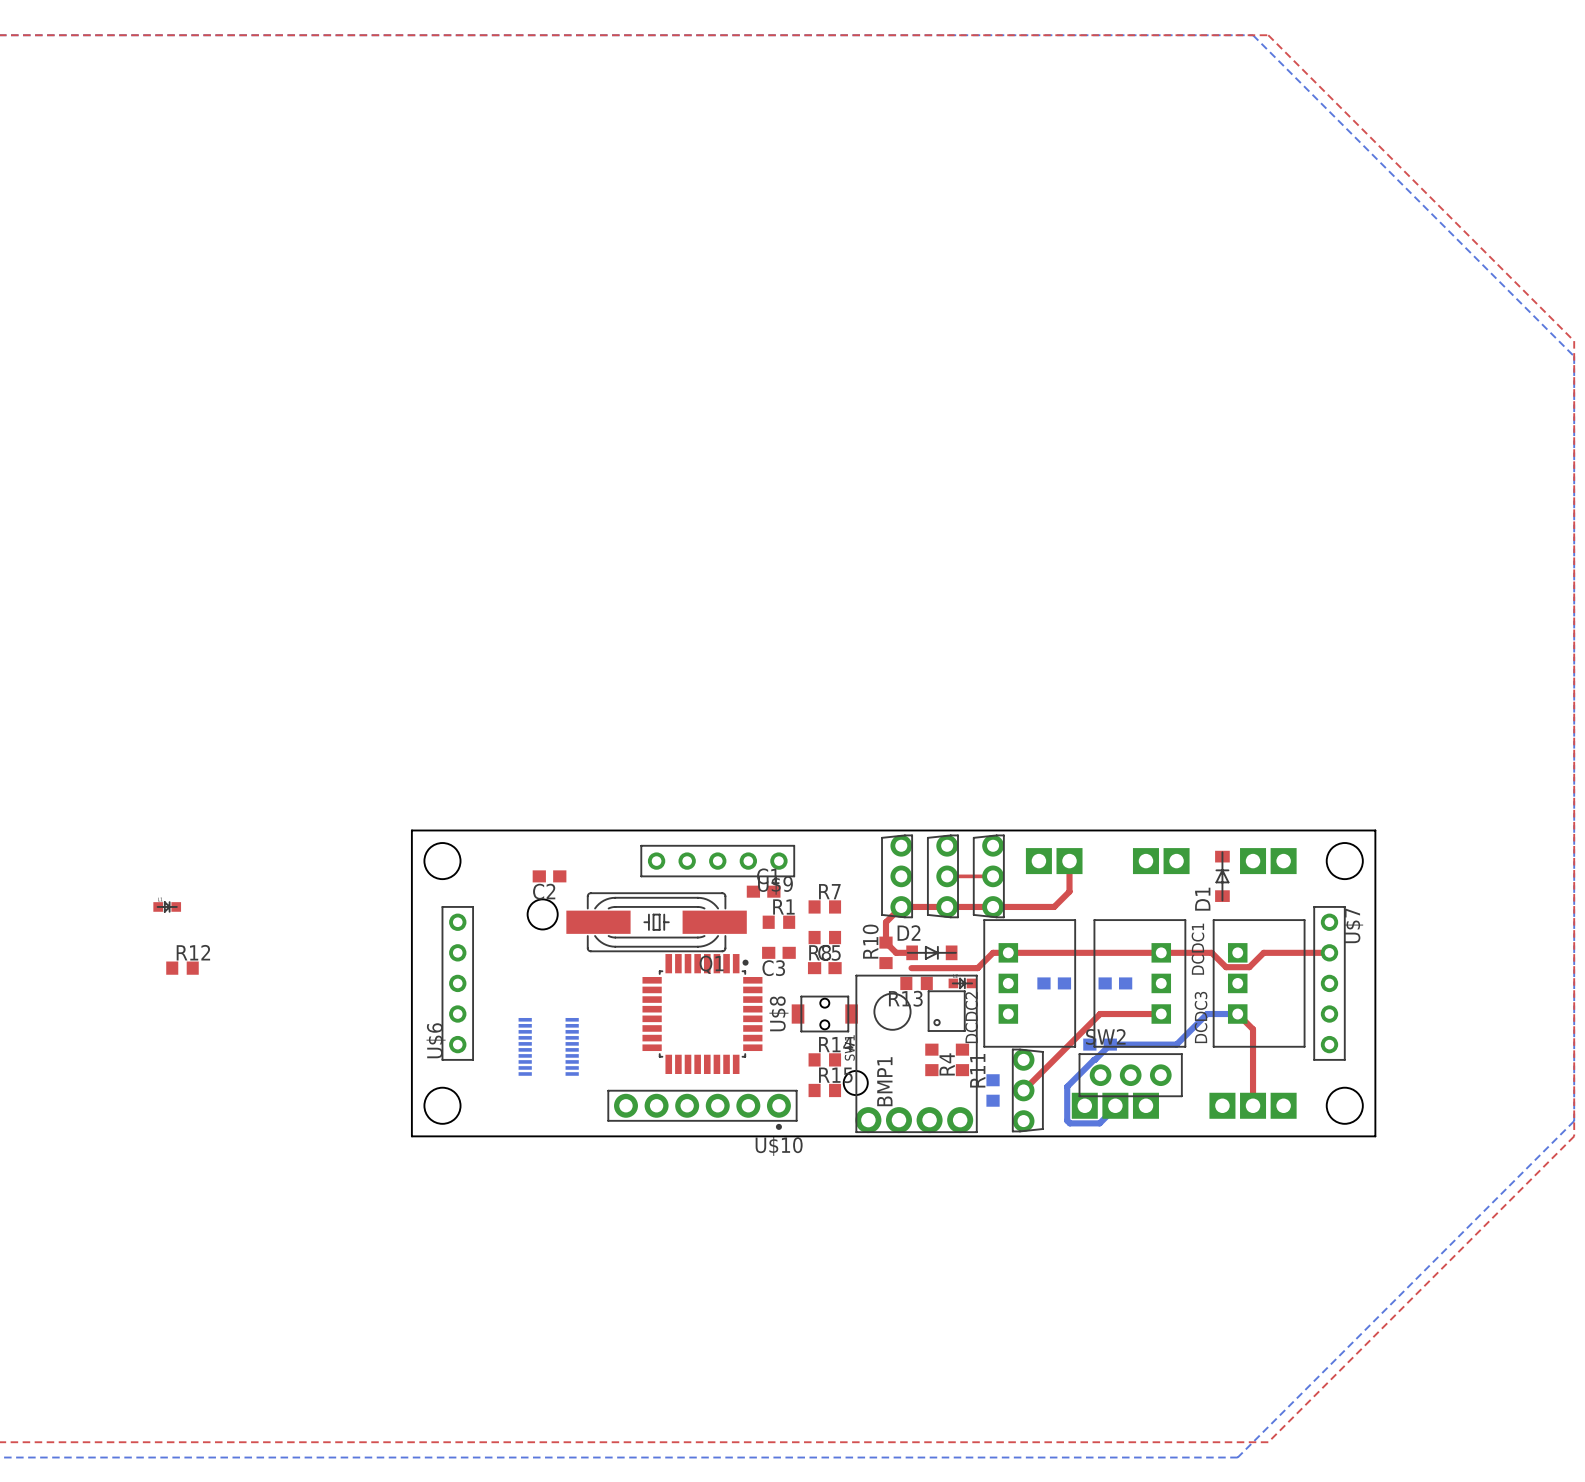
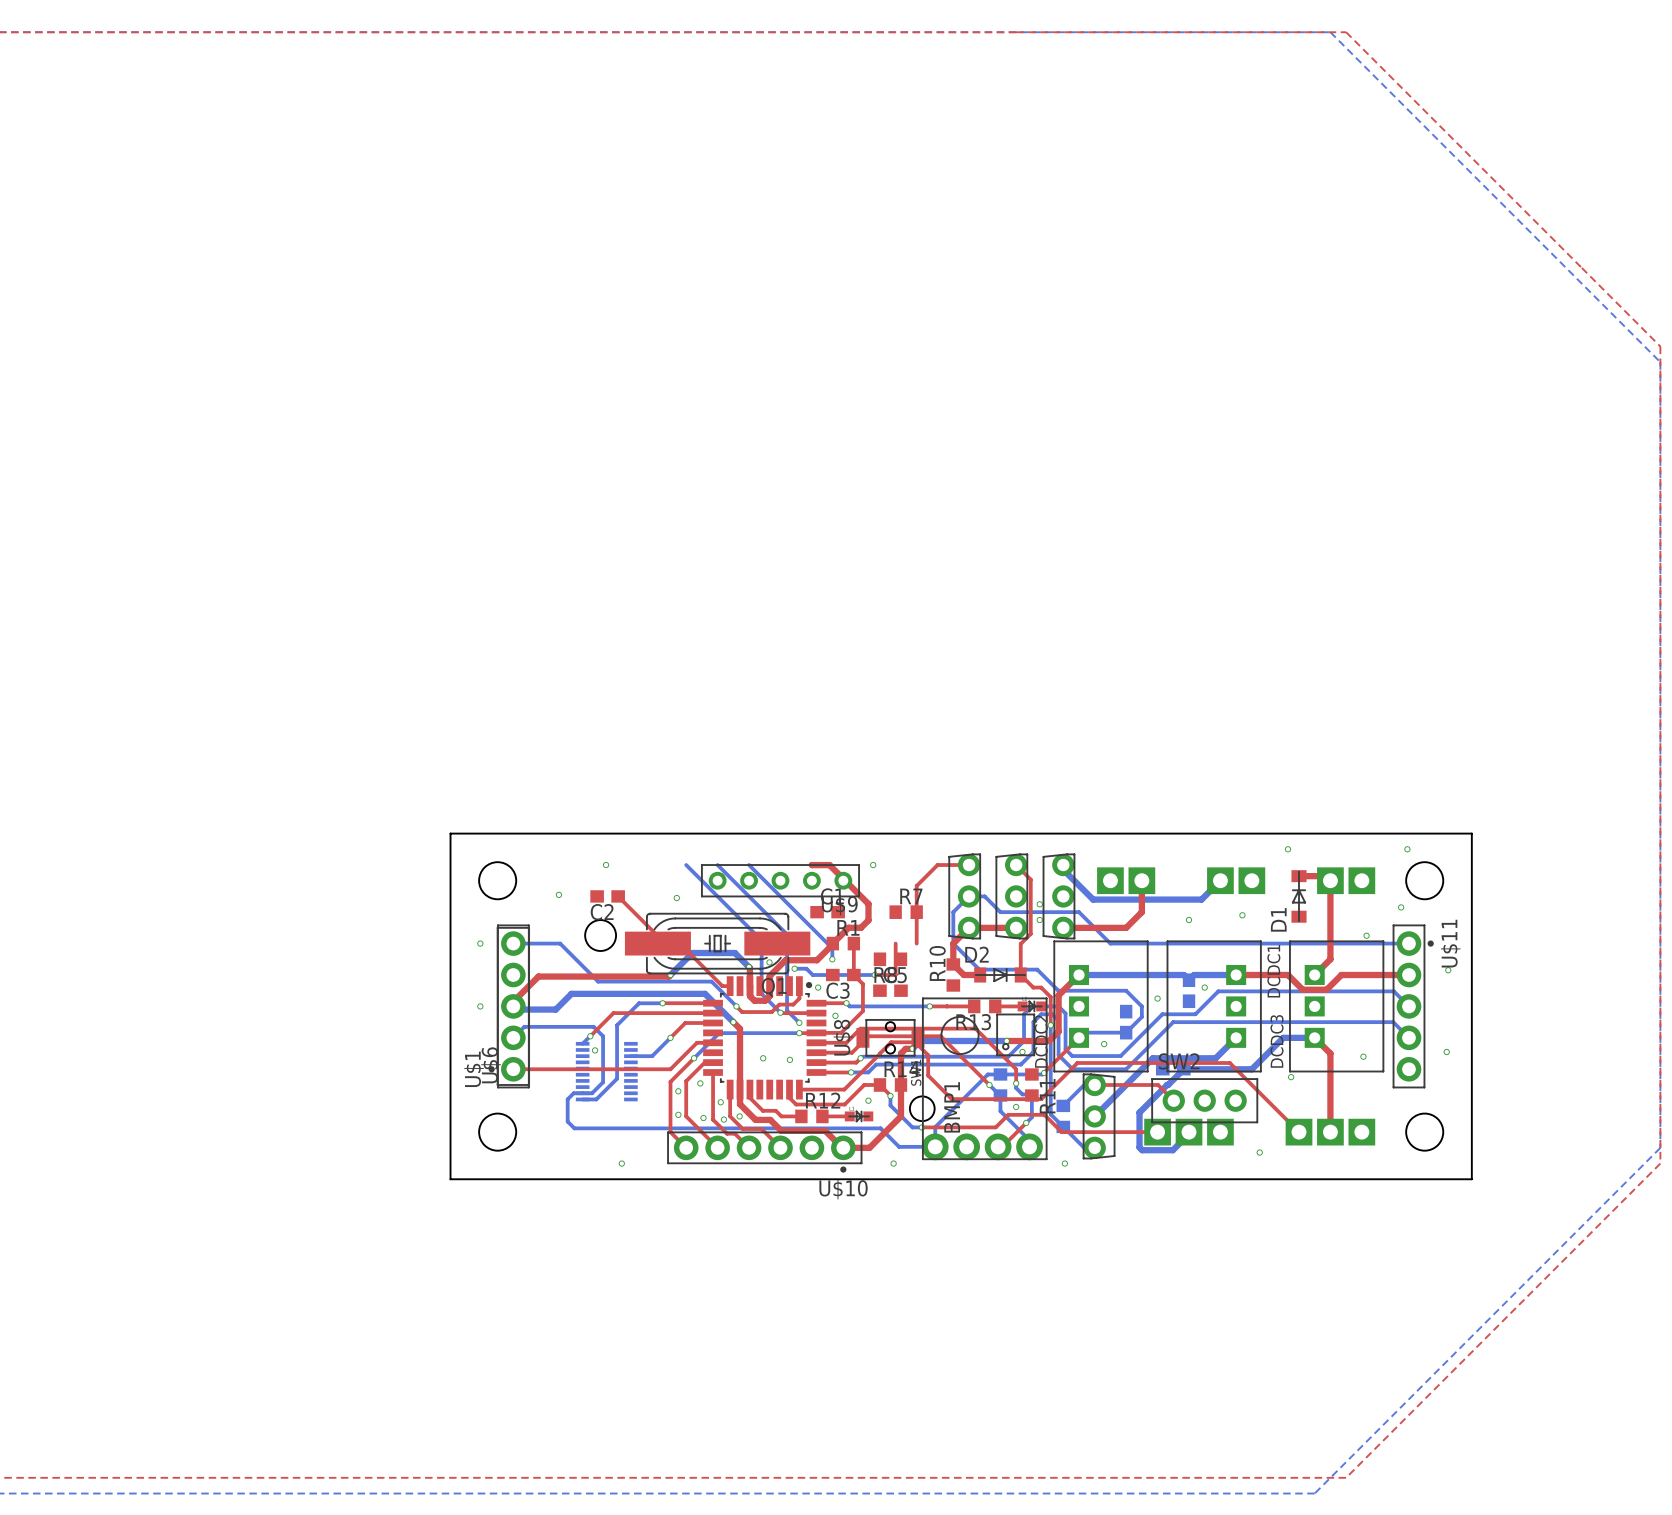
board edge: (411, 830) (411, 1136) (1375, 1136) (1375, 830) (411, 830) -> (450, 833) (450, 1179) (1471, 1179) (1471, 833) (450, 833)
via: none -> (1288, 849)
via: none -> (1407, 849)
via: none -> (606, 865)
bottom track: none -> (686, 865) (761, 940) (761, 993) (780, 1012)
bottom track: none -> (717, 865) (787, 934) (787, 1010) (799, 1022)
bottom track: none -> (749, 865) (832, 948) (832, 959)
top track: none -> (812, 865) (829, 865) (868, 904) (868, 920) (861, 927) (848, 927) (817, 960) (785, 960) (769, 976) (769, 996) (765, 1000) (754, 1000) (750, 996) (749, 967)
via: none -> (873, 865)
top track: none -> (969, 865) (937, 865) (916, 885) (916, 943)
top track: none -> (1016, 865) (1030, 879) (1030, 933) (1020, 943) (1020, 975) (1033, 987) (1041, 987) (1050, 997) (1050, 1025)
bottom track: none -> (1063, 865) (1063, 869) (1093, 899) (1201, 899) (1220, 880)
top track: none -> (1299, 876) (1325, 876) (1330, 880) (1330, 959) (1314, 975)
via: none -> (558, 894)
top track: none -> (618, 896) (657, 936) (657, 943) (679, 943) (722, 986) (730, 986)
top track: (947, 876) (993, 876) -> none
via: none -> (676, 898)
via: none -> (1039, 904)
via: none -> (1401, 907)
via: none -> (1242, 915)
via: none -> (1039, 920)
via: none -> (1189, 920)
part position: (167, 906) -> (859, 1116)
R7 position: (824, 906) -> (906, 912)
top track: (947, 906) (993, 906) -> none
via: none -> (1366, 935)
via: none -> (480, 943)
bottom track: none -> (513, 943) (560, 943) (598, 981) (711, 981) (736, 1006)
top track: none -> (853, 943) (853, 975) (862, 984) (862, 1011) (841, 1032) (799, 1033)
top track: none -> (895, 943) (895, 975) (874, 975)
bottom track: none -> (1408, 943) (1110, 943) (1079, 912) (1000, 912) (984, 896) (969, 896) (953, 912) (953, 943) (979, 969) (1037, 969) (1058, 990) (1126, 990) (1141, 1006) (1141, 1016) (1126, 1032) (1084, 1032) (1079, 1037)
via: none -> (832, 959)
via: none -> (769, 962)
bottom track: none -> (749, 967) (734, 953) (692, 953) (670, 975)
via: none -> (749, 967)
bottom track: none -> (794, 968) (806, 968) (812, 975) (874, 975)
via: none -> (794, 968)
via: none -> (1448, 970)
top track: none -> (670, 975) (668, 976) (538, 976) (513, 1001) (513, 1006)
via: none -> (670, 975)
via: none -> (874, 975)
top track: none -> (1079, 975) (1058, 995) (1058, 1031) (1049, 1040) (1006, 1040)
bottom track: none -> (1079, 975) (1183, 975) (1189, 980) (1194, 975) (1236, 975)
top track: (1161, 952) (993, 952) (977, 968) (911, 968) -> none
top track: none -> (799, 986) (799, 998) (793, 1004) (779, 1004) (771, 1012) (742, 1012) (736, 1006)
via: none -> (818, 987)
via: none -> (1204, 987)
R12 position: (182, 968) -> (811, 1116)
via: none -> (1157, 998)
top track: none -> (662, 1003) (713, 1003)
bottom track: none -> (662, 1003) (639, 1003) (617, 1025) (617, 1078) (596, 1099) (582, 1099)
via: none -> (662, 1003)
top track: none -> (816, 1003) (846, 1003)
bottom track: none -> (846, 1003) (849, 1006) (929, 1006)
via: none -> (846, 1003)
via: none -> (480, 1006)
U$1: none -> (509, 1006)
bottom track: none -> (513, 1006) (516, 1009) (555, 1009) (571, 993) (705, 993) (733, 1022)
via: none -> (736, 1006)
via: none -> (929, 1006)
top track: none -> (995, 1006) (1022, 1006)
part rotation: 0° (1054, 983) -> 90° clockwise (1126, 1022)
part rotation: 0° (1115, 983) -> 90° clockwise (1189, 990)
bottom track: none -> (1408, 1006) (1393, 991) (1218, 991) (1195, 1014) (1162, 1014) (1120, 1056) (1072, 1056) (1065, 1049) (1065, 1013) (1058, 1006) (1031, 1006) (1024, 1014) (1024, 1040) (1008, 1056) (862, 1056) (860, 1058)
U$7: (1329, 983) -> none
U$11: none -> (1413, 1006)
top track: none -> (713, 1013) (613, 1013) (590, 1036)
top track: none -> (780, 1012) (816, 1013)
via: none -> (780, 1012)
via: none -> (835, 1015)
top track: none -> (733, 1022) (740, 1028) (740, 1104) (755, 1119) (770, 1119) (781, 1130) (825, 1130) (842, 1147) (869, 1147) (900, 1116) (900, 1053) (905, 1048) (912, 1048)
via: none -> (733, 1022)
top track: none -> (713, 1023) (685, 1023) (670, 1037)
via: none -> (799, 1022)
bottom track: none -> (1050, 1025) (1050, 1114) (1084, 1147) (1094, 1147)
via: none -> (1050, 1025)
bottom track: none -> (799, 1033) (719, 1033) (694, 1058)
via: none -> (799, 1033)
bottom track: none -> (590, 1036) (582, 1043)
via: none -> (590, 1036)
bottom track: none -> (513, 1037) (524, 1026) (593, 1026) (603, 1036) (603, 1082) (592, 1093) (573, 1093) (567, 1099) (567, 1121) (574, 1128) (880, 1128) (899, 1146) (935, 1146) (935, 1127) (987, 1074) (1044, 1073)
bottom track: none -> (670, 1037) (652, 1056) (630, 1056)
via: none -> (670, 1037)
top track: none -> (1079, 1037) (1044, 1073)
top track: (1161, 1014) (1100, 1014) (1023, 1090) -> none
bottom track: none -> (1236, 1037) (1215, 1058) (1152, 1058) (1094, 1116)
bottom track: none -> (1408, 1037) (1393, 1022) (1173, 1022) (1126, 1069) (1072, 1069) (1058, 1055) (1058, 1020) (1052, 1014) (1041, 1014) (1033, 1022) (1033, 1051) (1020, 1064) (876, 1064) (868, 1072) (851, 1072)
bottom track: none -> (1006, 1040) (920, 1040) (912, 1048)
via: none -> (1006, 1040)
top track: none -> (713, 1042) (696, 1042) (670, 1069) (513, 1069)
top track: none -> (816, 1042) (846, 1042) (860, 1028) (975, 1028) (1016, 1069) (1016, 1083)
via: none -> (1104, 1044)
via: none -> (912, 1048)
via: none -> (595, 1050)
via: none -> (1022, 1051)
via: none -> (1446, 1051)
top track: none -> (816, 1052) (852, 1052) (868, 1036) (940, 1036) (989, 1084)
via: none -> (1363, 1056)
top track: none -> (694, 1058) (670, 1081) (670, 1132) (686, 1147)
via: none -> (694, 1058)
via: none -> (763, 1058)
top track: none -> (860, 1058) (856, 1062) (816, 1062)
via: none -> (860, 1058)
via: none -> (789, 1059)
top track: none -> (713, 1062) (704, 1062) (686, 1081) (686, 1116) (717, 1147)
top track: none -> (713, 1072) (713, 1119) (727, 1133) (734, 1133) (749, 1147)
top track: none -> (816, 1072) (851, 1072)
via: none -> (851, 1072)
via: none -> (1044, 1073)
via: none -> (1291, 1077)
via: none -> (700, 1083)
bottom track: none -> (1016, 1083) (1016, 1088) (1022, 1094) (1031, 1095) (1031, 1117) (1026, 1122)
via: none -> (1016, 1083)
bottom track: none -> (989, 1084) (1000, 1095) (1000, 1111) (1029, 1140) (1029, 1146)
via: none -> (989, 1084)
R4 side: top (931, 1059) -> bottom (1000, 1084)
top track: none -> (1094, 1084) (1158, 1084) (1173, 1100)
bottom track: none -> (1094, 1084) (1084, 1084) (1063, 1105)
top track: none -> (730, 1089) (730, 1116) (742, 1128) (761, 1128) (780, 1147)
top track: none -> (749, 1089) (749, 1097) (762, 1110) (775, 1110) (781, 1116) (801, 1116)
top track: none -> (789, 1089) (789, 1097) (796, 1104) (844, 1104) (864, 1084) (879, 1084) (890, 1095)
top track: none -> (799, 1089) (844, 1089) (891, 1042) (915, 1042) (928, 1055) (928, 1075) (951, 1099) (1041, 1099) (1077, 1062) (1229, 1062) (1299, 1132)
via: none -> (678, 1091)
bottom track: none -> (890, 1095) (890, 1105) (912, 1127) (921, 1127)
via: none -> (890, 1095)
via: none -> (868, 1100)
via: none -> (720, 1102)
via: none -> (1016, 1106)
via: none -> (678, 1114)
via: none -> (739, 1116)
top track: none -> (822, 1116) (849, 1116)
R15: (824, 1090) -> none
via: none -> (703, 1117)
via: none -> (723, 1119)
top track: none -> (1026, 1122) (1002, 1146) (998, 1146)
via: none -> (1026, 1122)
top track: none -> (921, 1127) (995, 1127) (1008, 1114) (1044, 1114) (1061, 1132) (1157, 1132)
via: none -> (921, 1127)
U$10 position: (702, 1109) -> (764, 1152)
via: none -> (1259, 1152)
via: none -> (621, 1163)
via: none -> (893, 1163)
via: none -> (1064, 1163)

